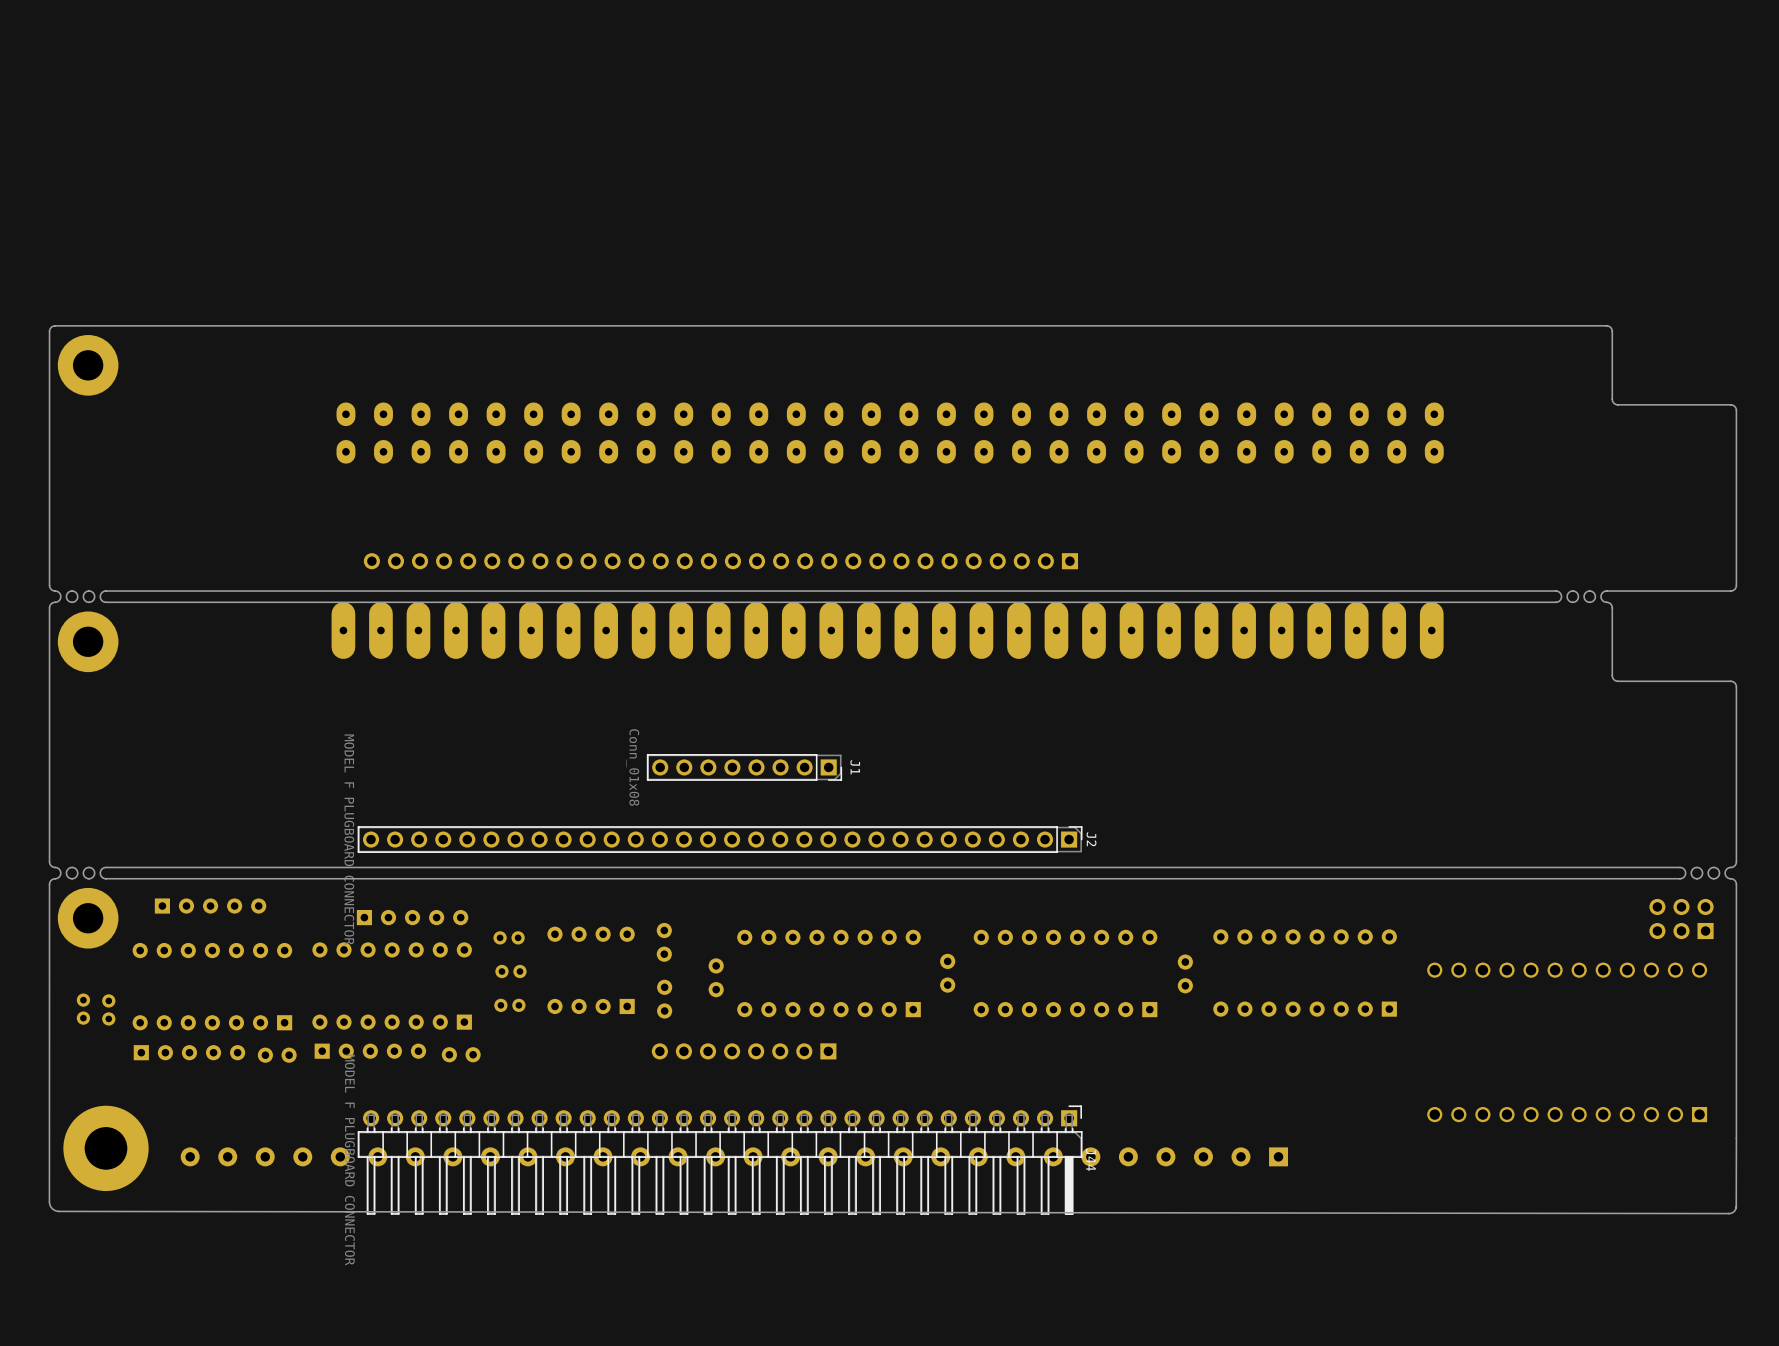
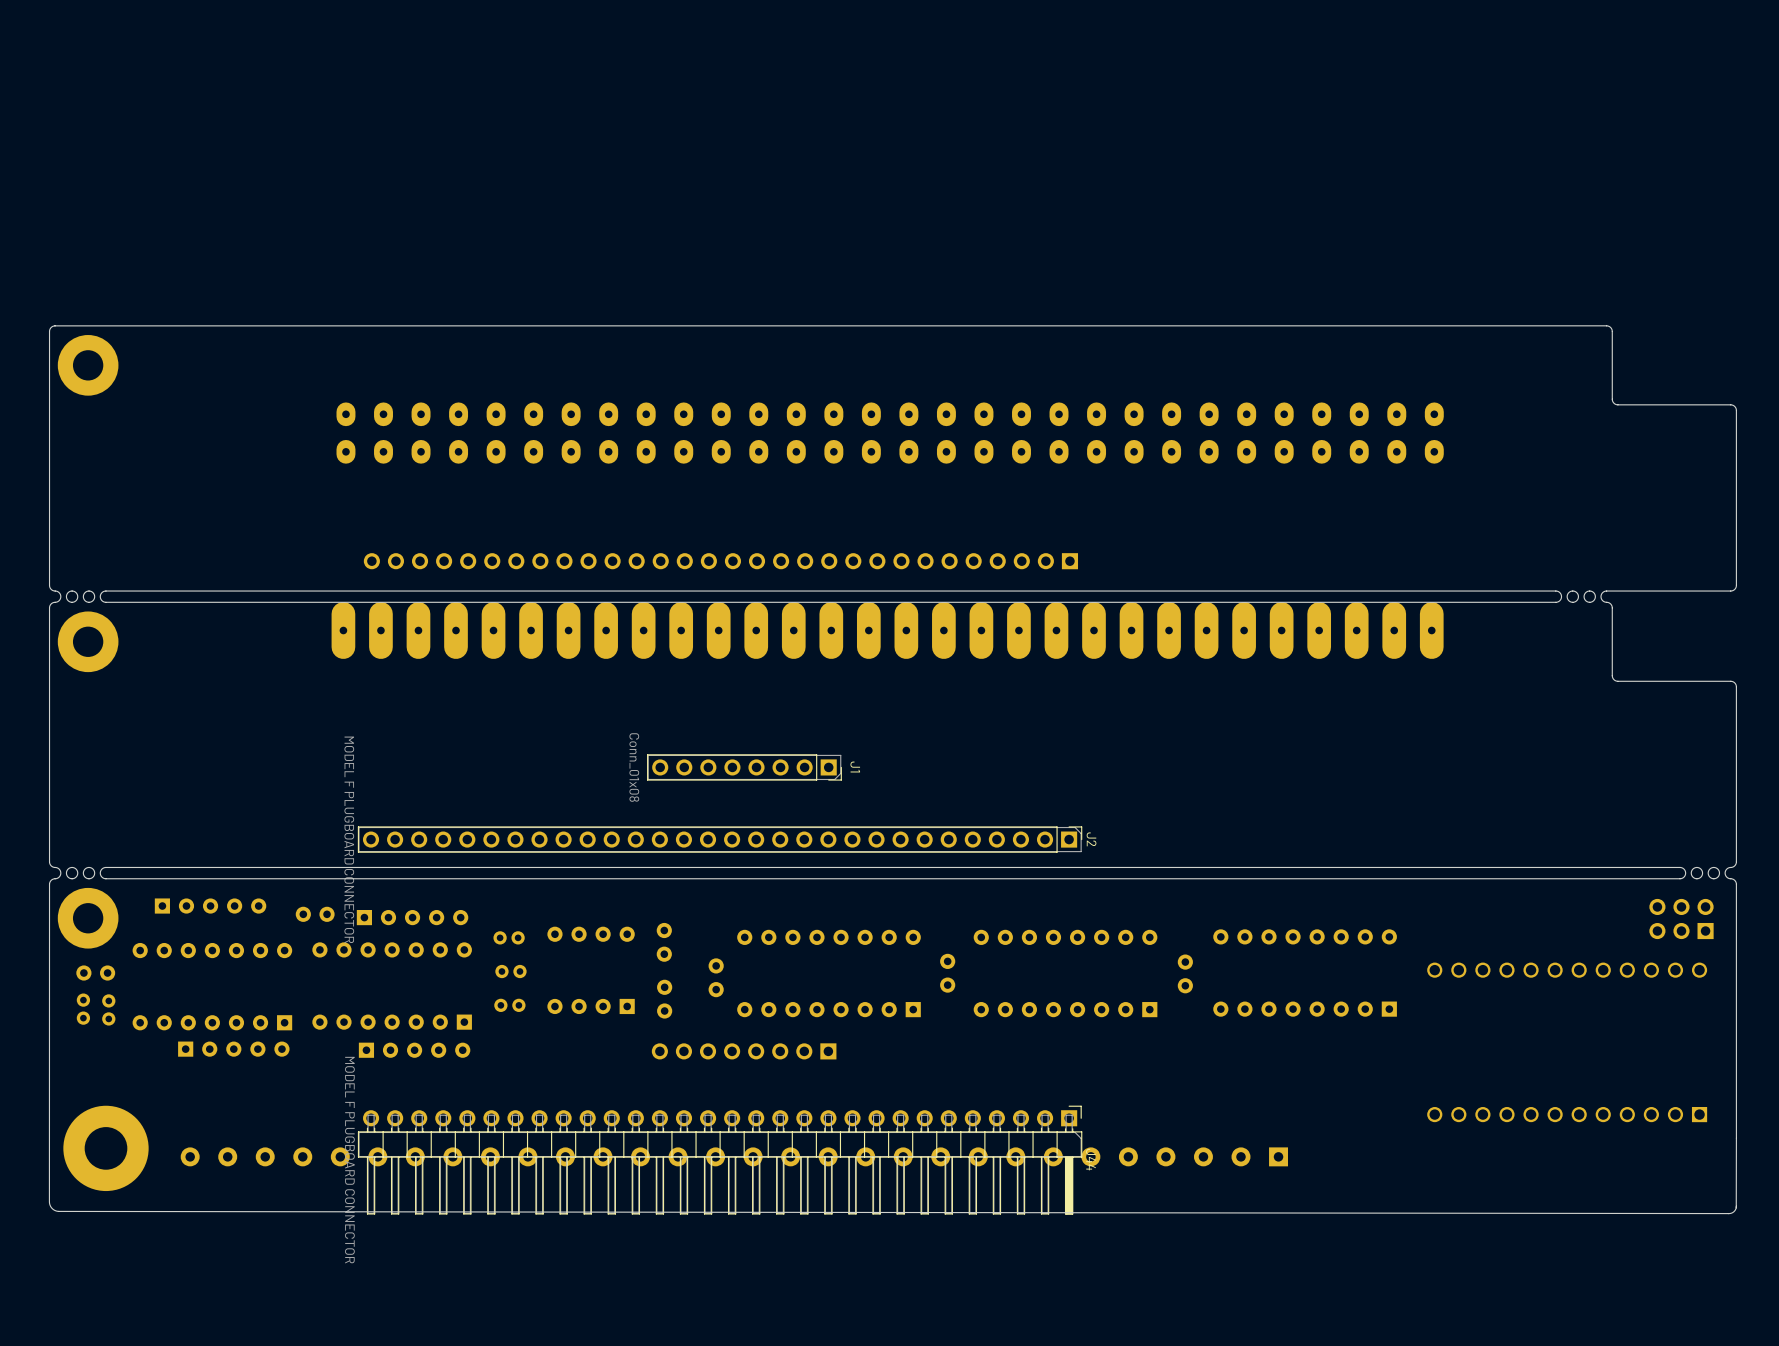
part: none -> (315, 914)
part: none -> (95, 973)
part position: (370, 1051) -> (414, 1050)
part position: (189, 1052) -> (233, 1049)
part: (461, 1054) -> none
part: (277, 1055) -> none

